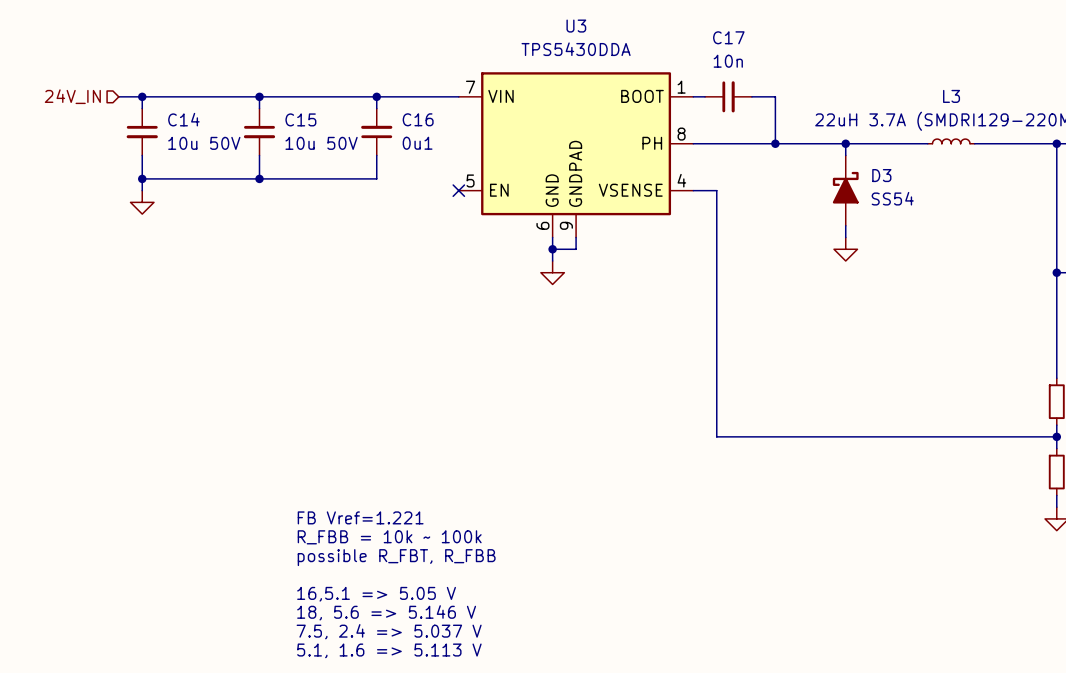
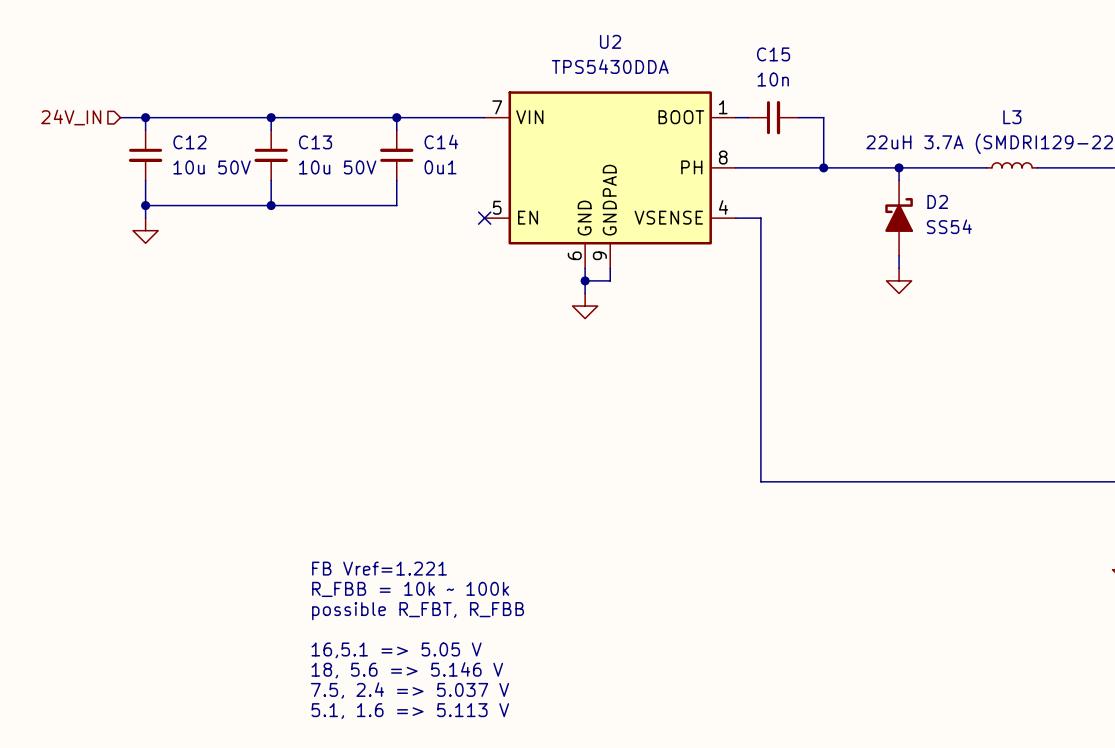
U3 name: U3 (576, 26) -> U2 (610, 41)
C17 name: C17 (728, 37) -> C15 (773, 54)
C14 name: C14 (183, 119) -> C12 (189, 142)
C15 name: C15 (300, 119) -> C13 (315, 142)
C16 name: C16 (418, 119) -> C14 (441, 141)
D3 name: D3 (881, 175) -> D2 (937, 201)

